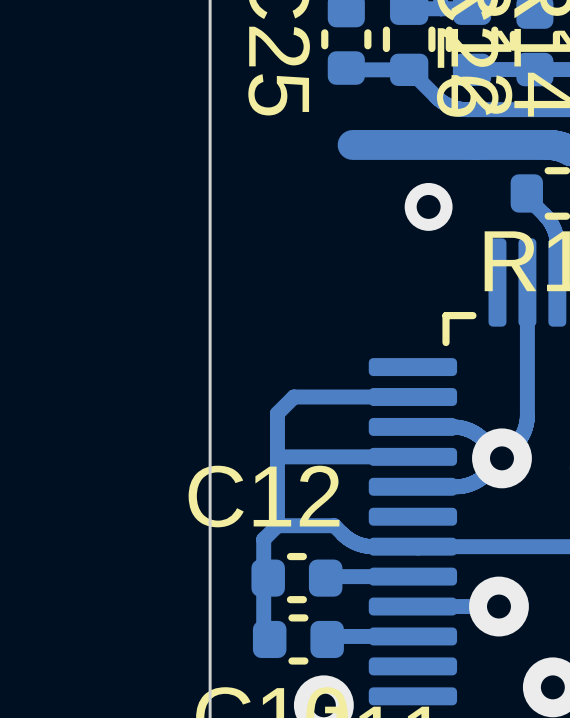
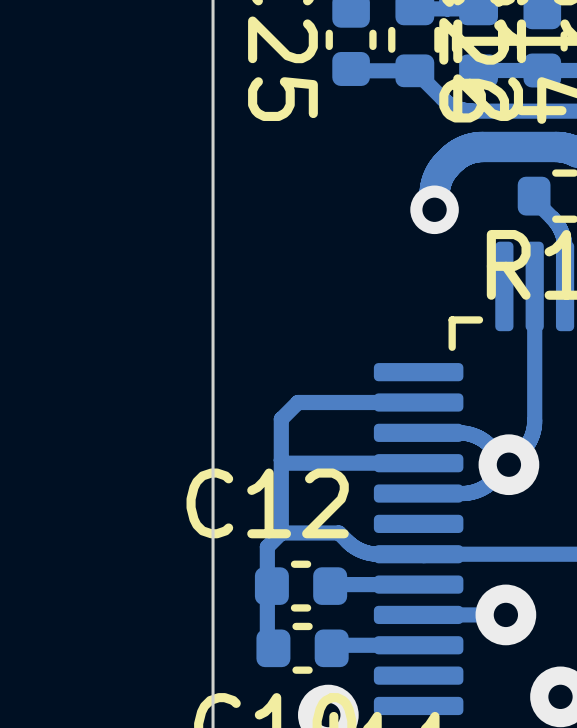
track: (475, 144) (352, 144) -> (482, 146) (461, 152) (443, 168) (435, 186) (434, 209)

